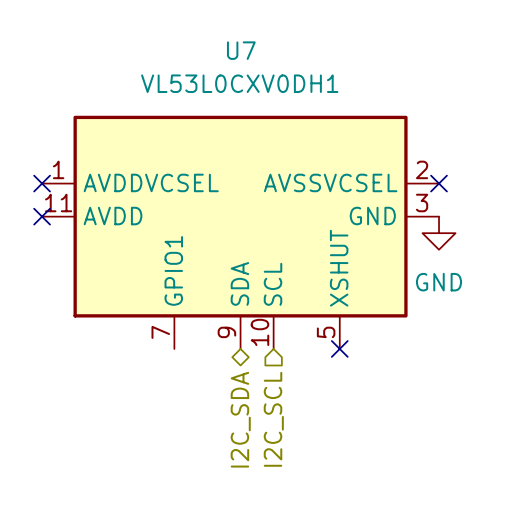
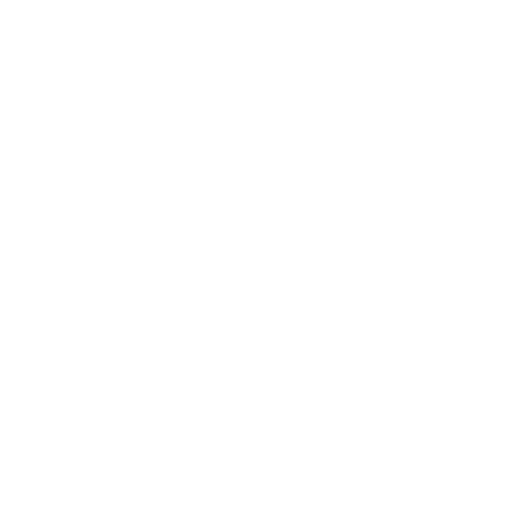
no-connect mark: (42, 183) -> none
no-connect mark: (439, 183) -> none
no-connect mark: (42, 216) -> none
U7: VL53L0CXV0DH1 (240, 232) -> none
power symbol: GND (439, 233) -> none
no-connect mark: (339, 348) -> none
hierarchical label: I2C_SDA (240, 419) -> none
hierarchical label: I2C_SCL (273, 419) -> none

